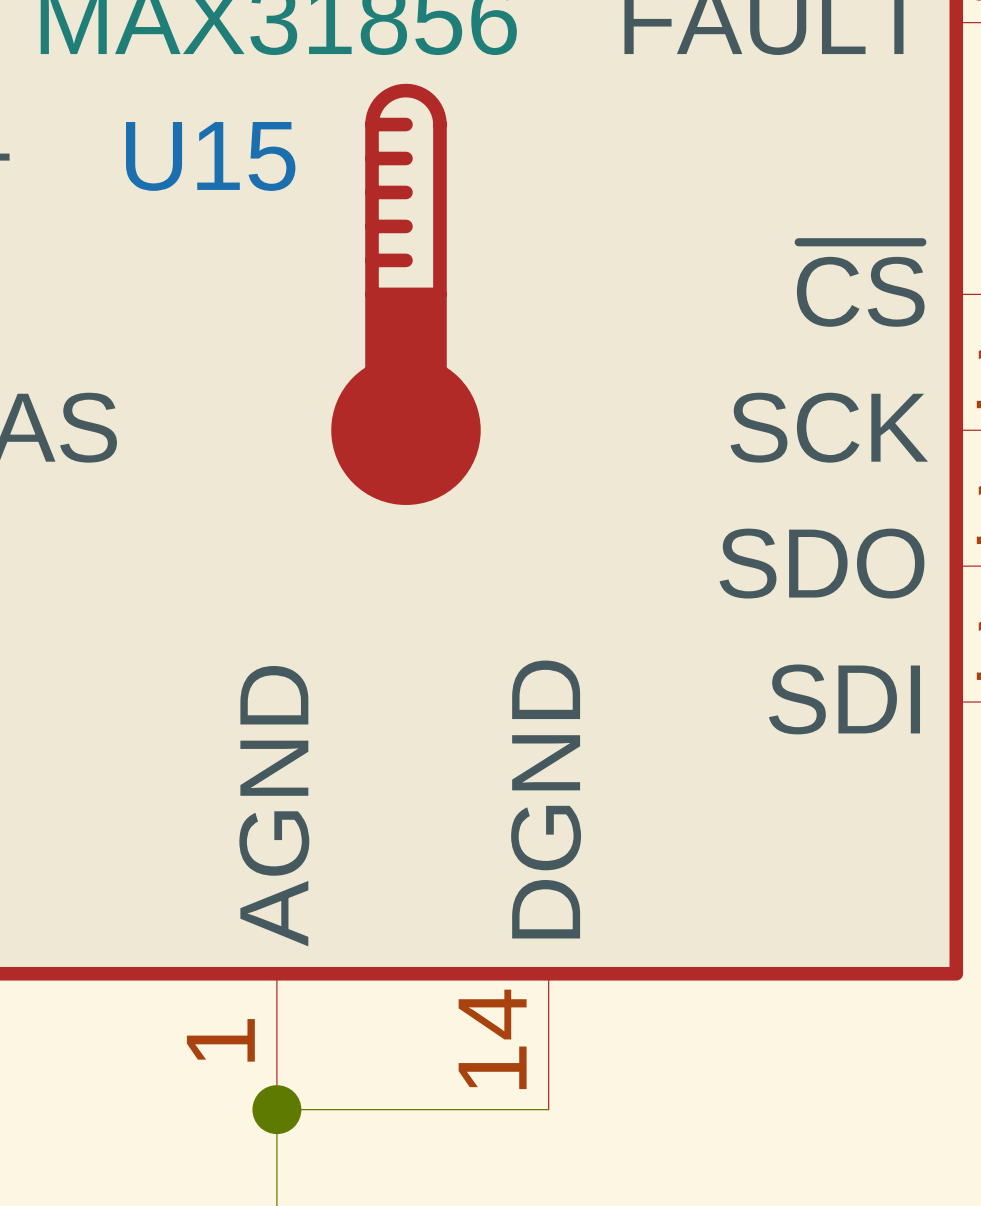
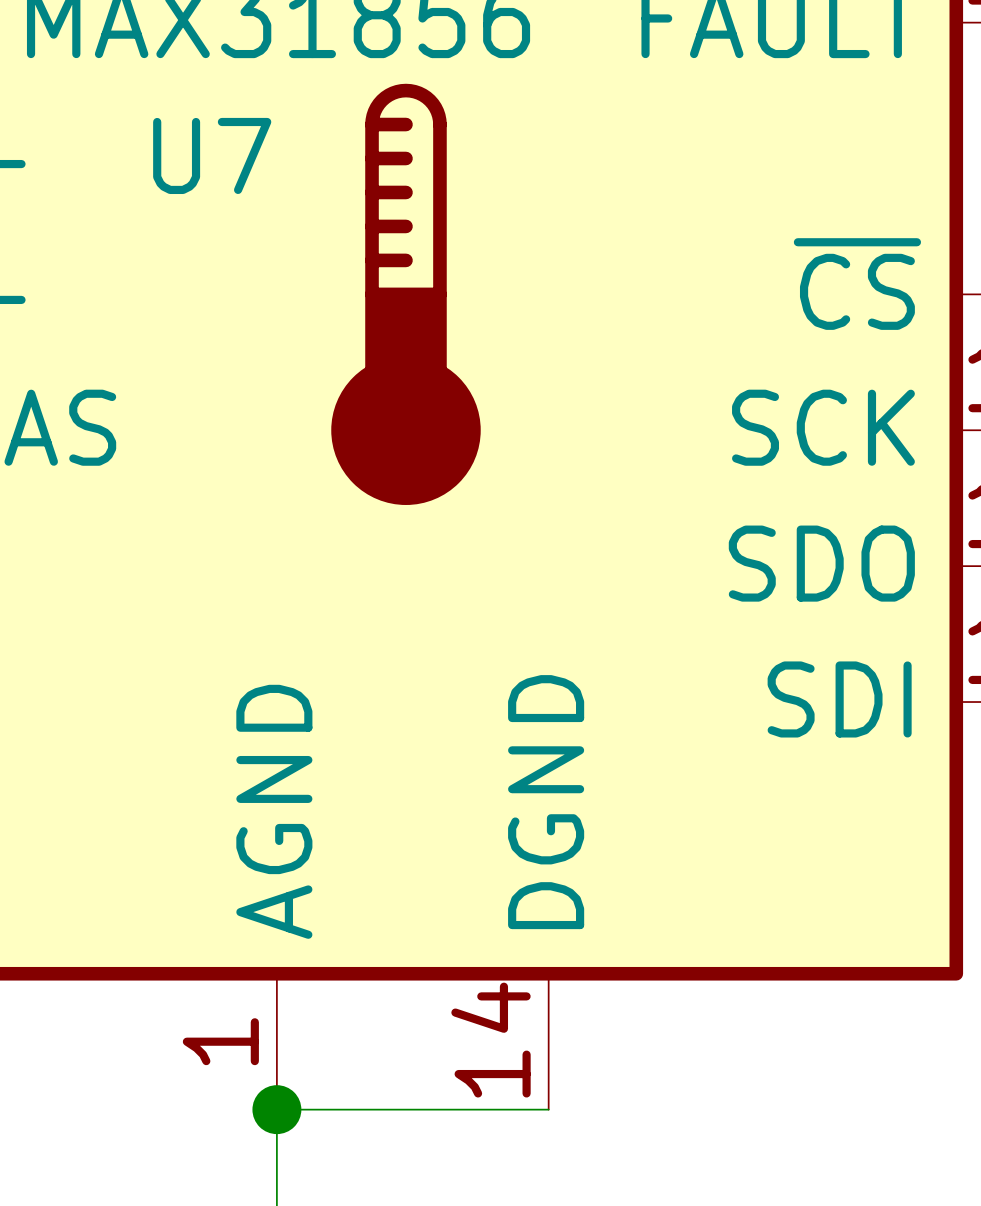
U15 name: U15 (210, 156) -> U7 (212, 155)

